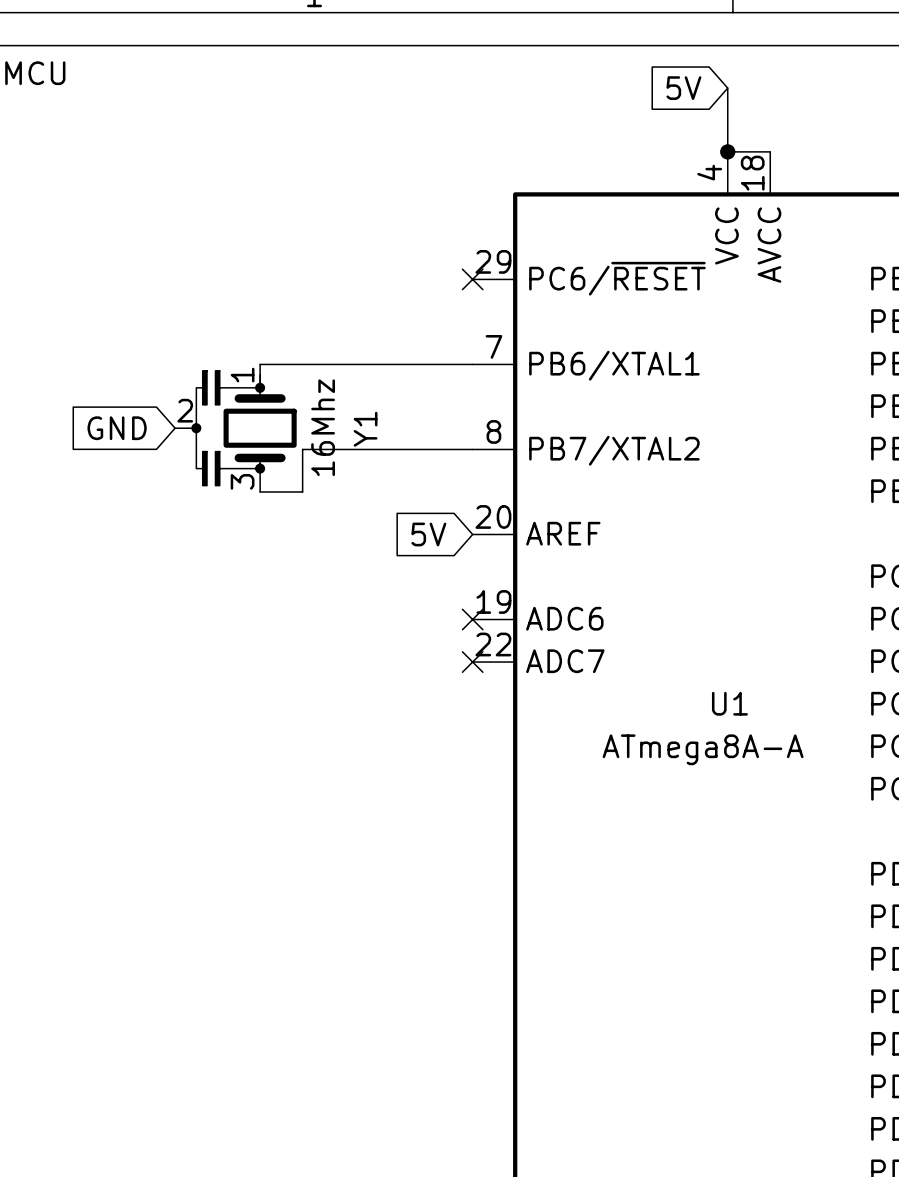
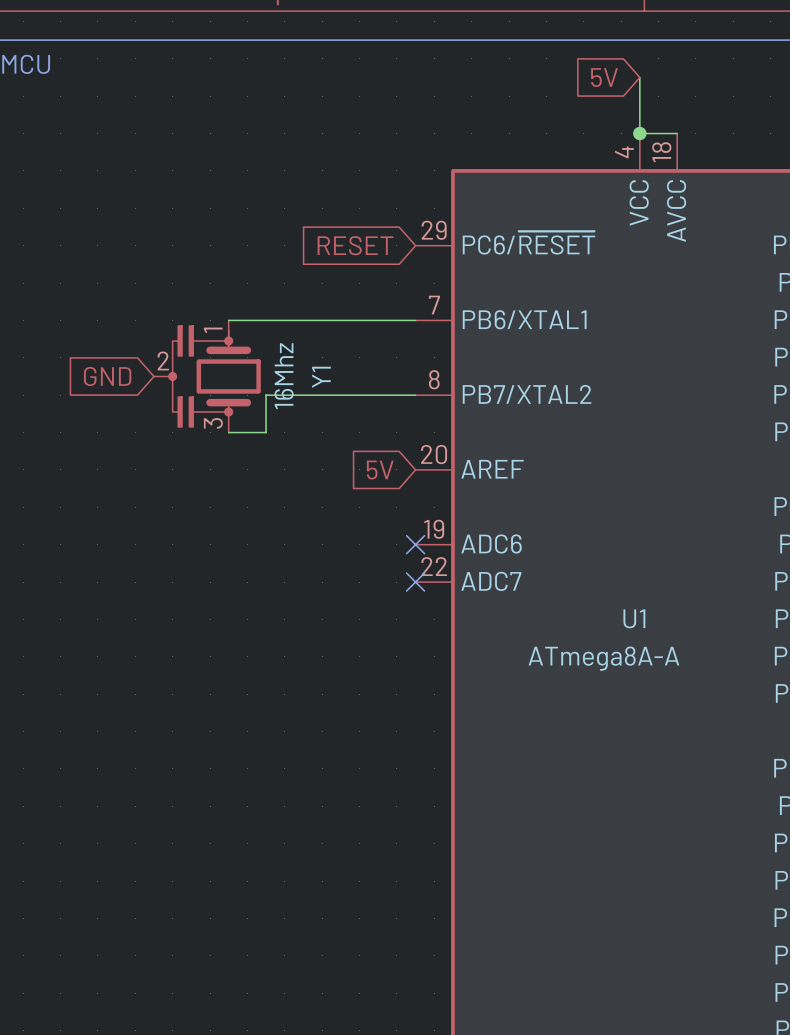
global label: none -> RESET (355, 245)
no-connect mark: (472, 279) -> none

